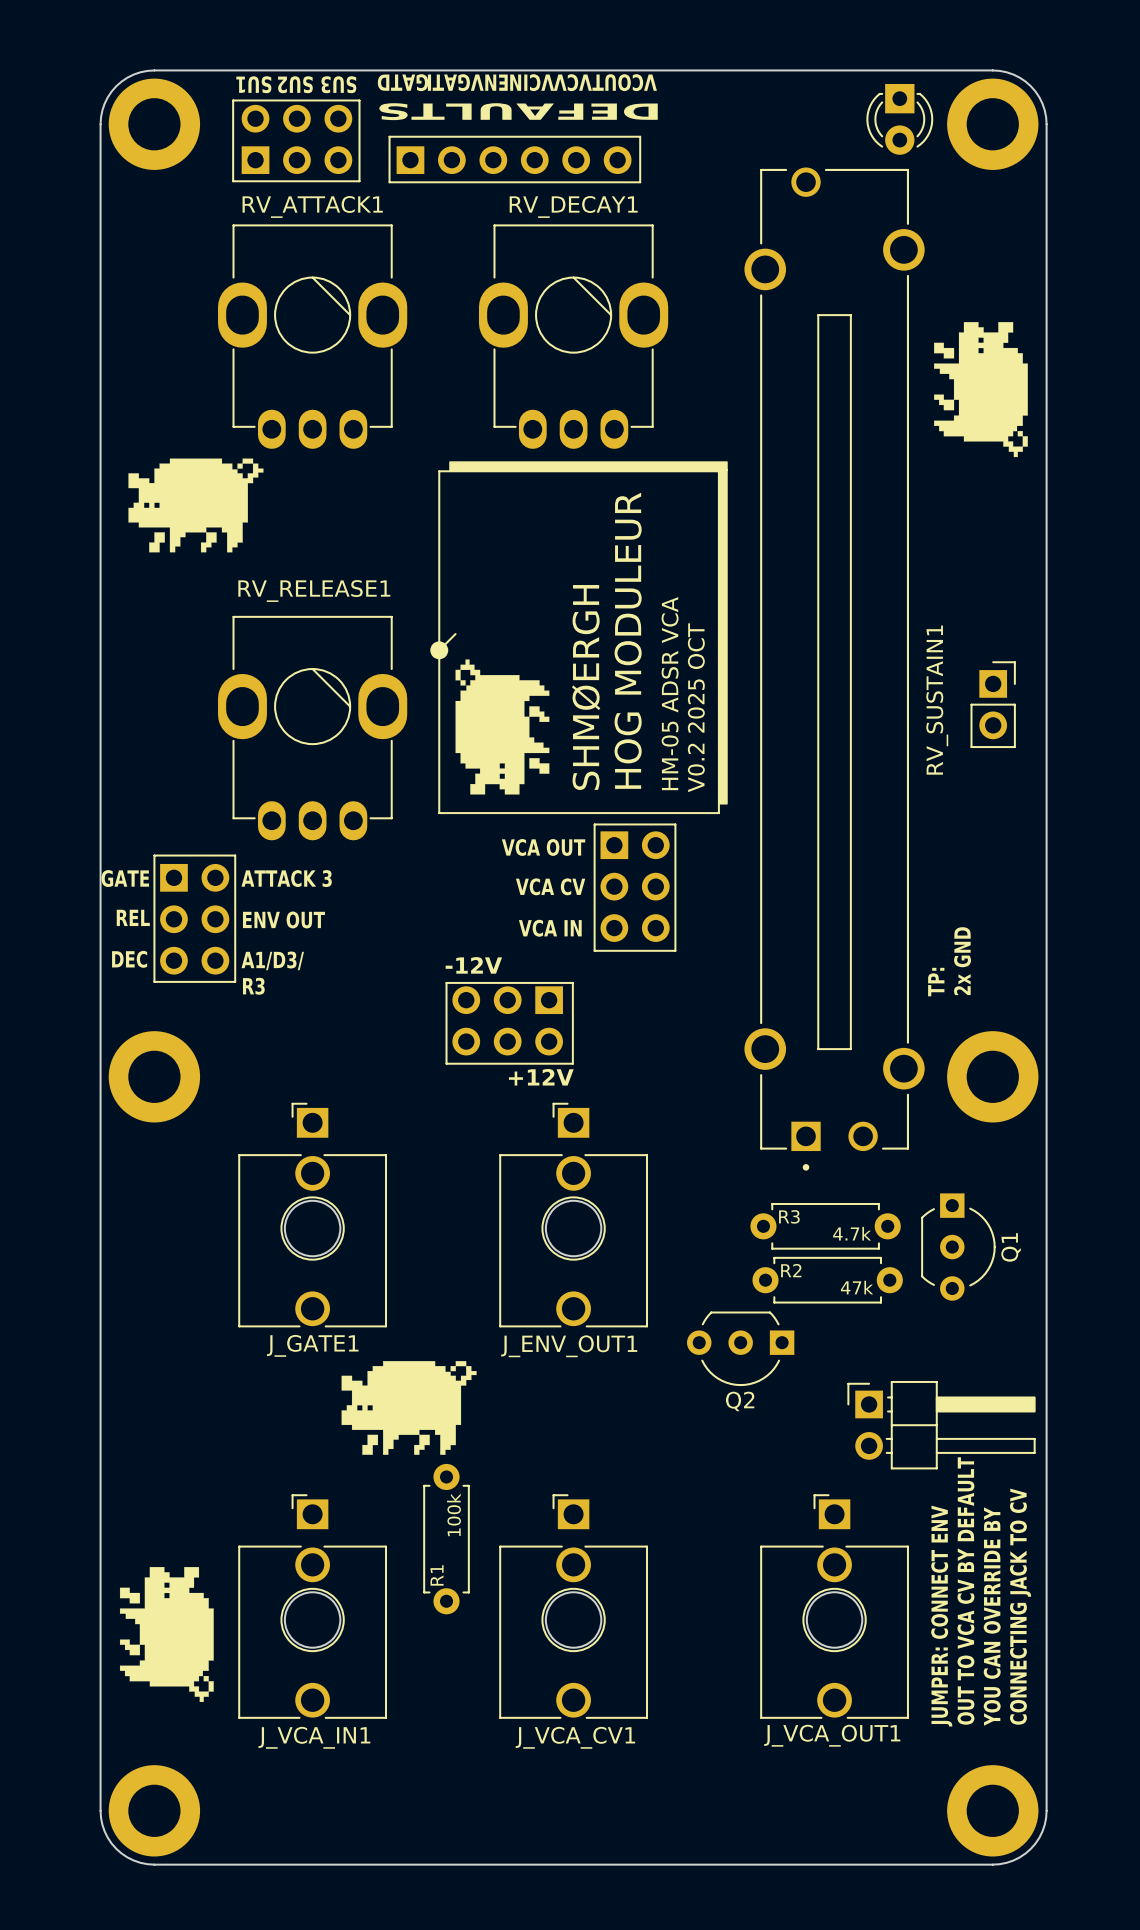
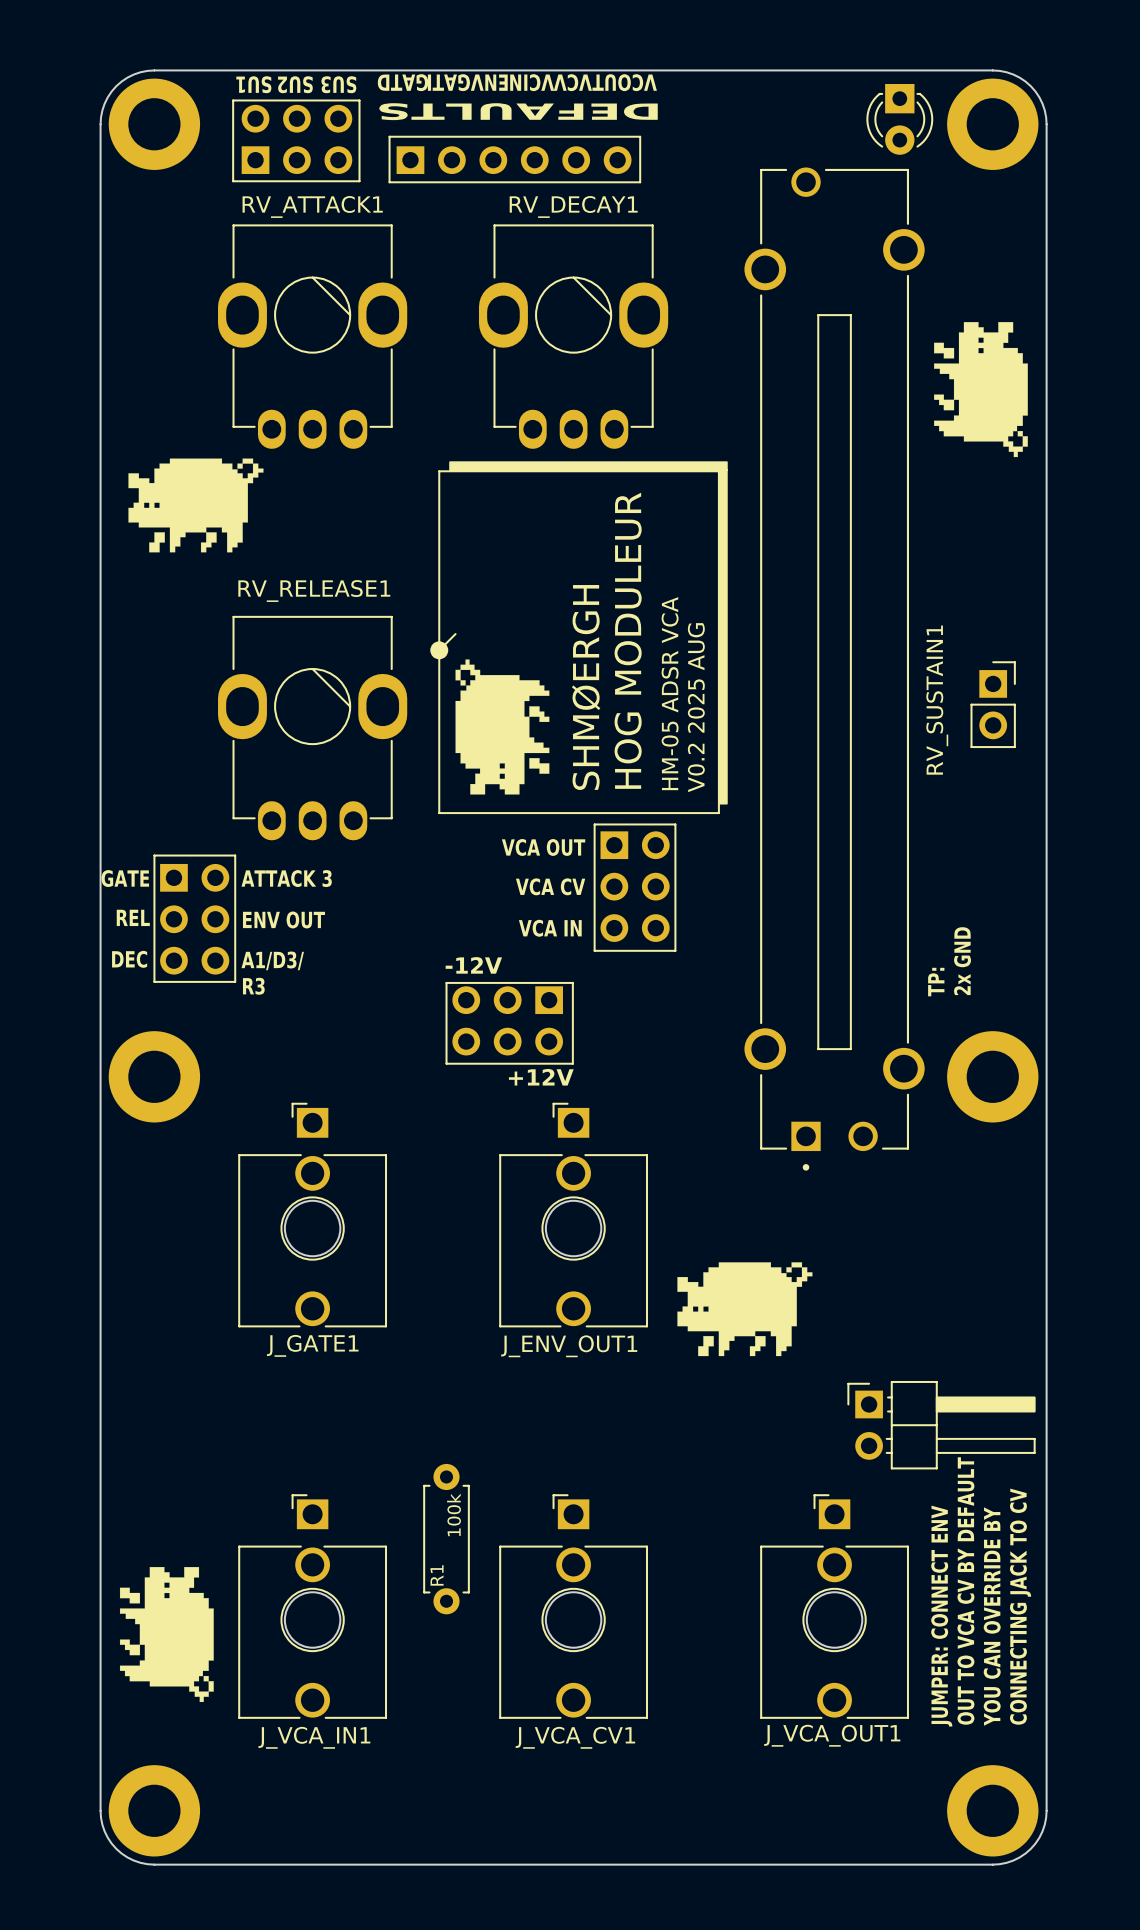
text: V0.2 2025 OCT (696, 707) -> V0.2 2025 AUG (696, 707)
R3: 4.7k (825, 1226) -> none
Q1: (958, 1247) -> none
R2: 47k (827, 1280) -> none
Q2: (740, 1348) -> none
drawing position: (409, 1407) -> (744, 1309)

